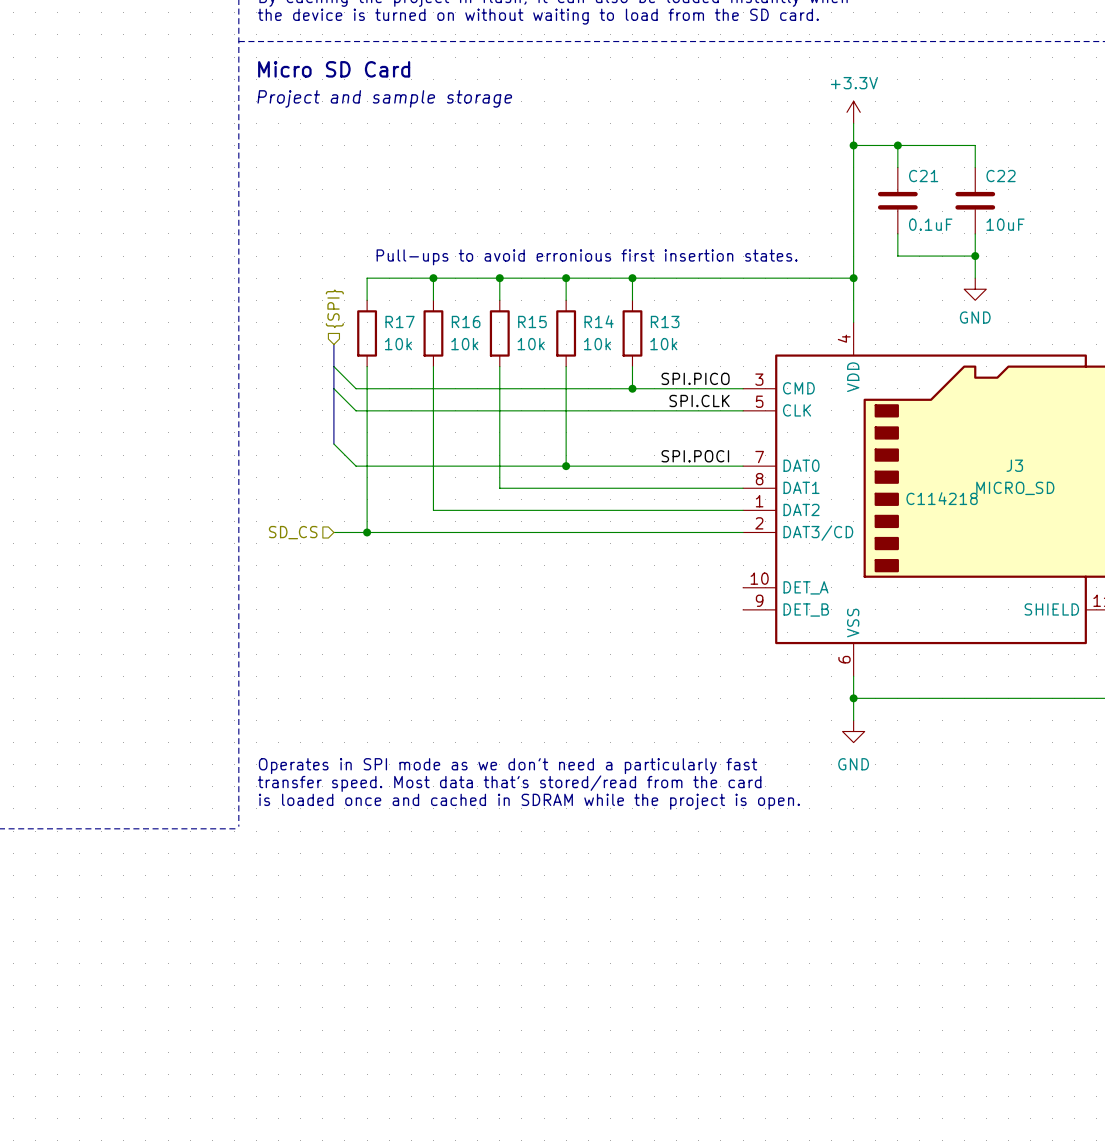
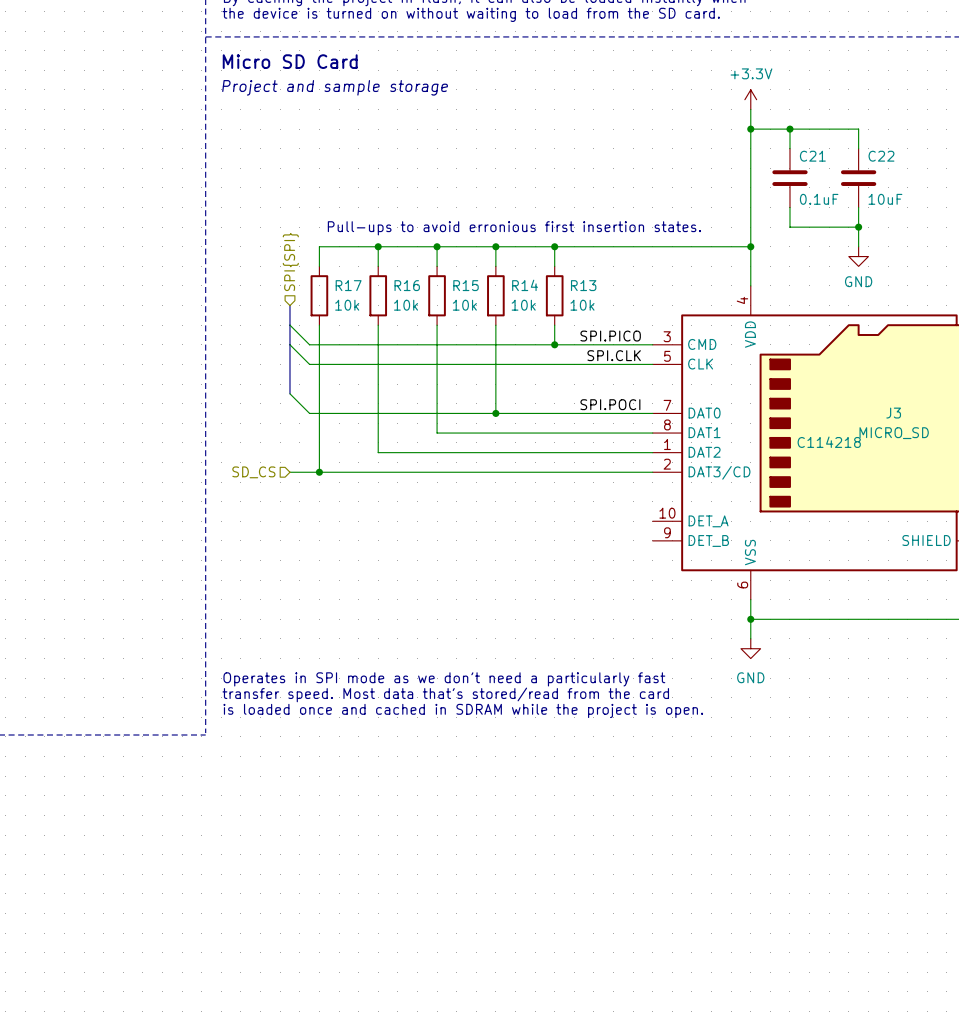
hierarchical label: {SPI} (334, 308) -> SPI{SPI} (290, 262)

